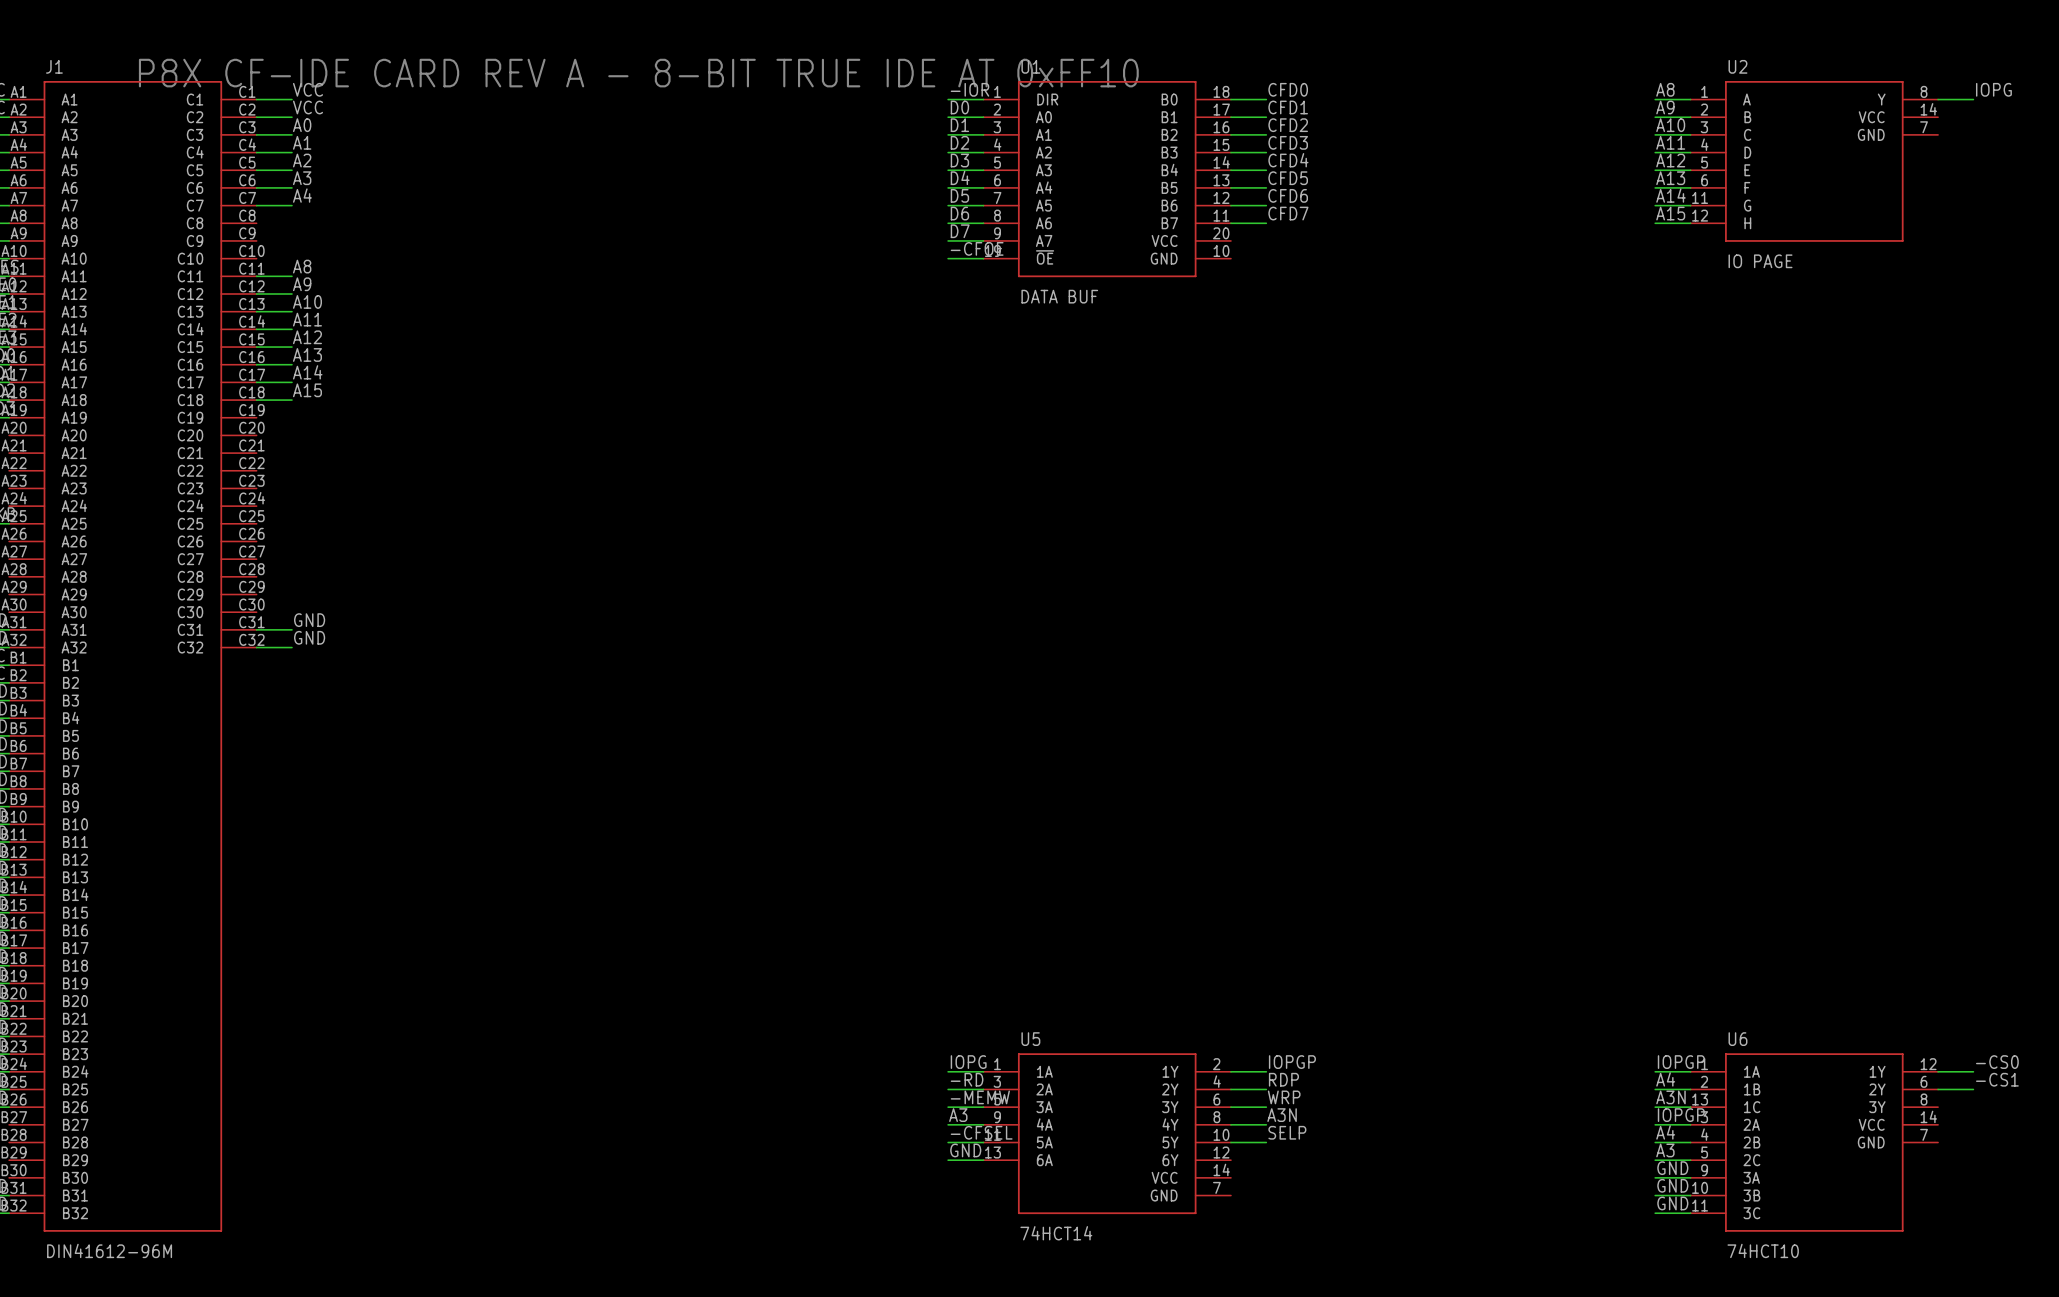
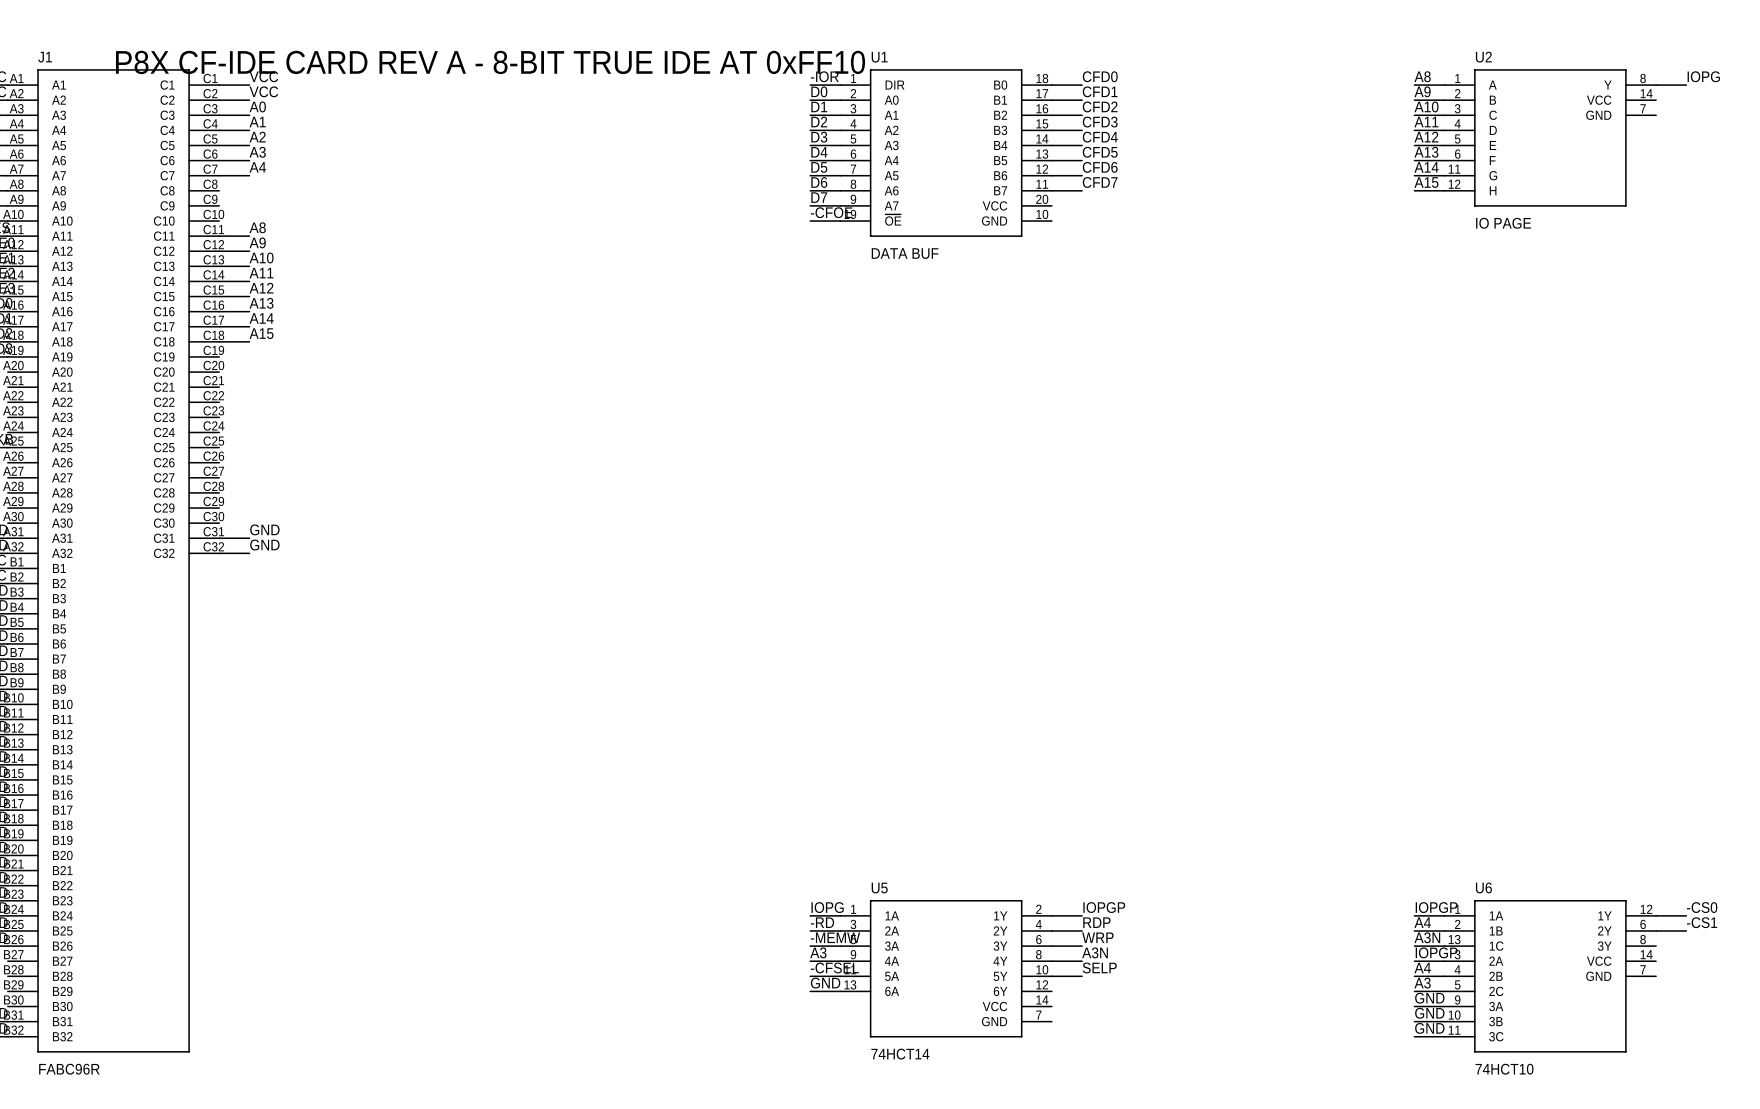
J1 value: DIN41612-96M (109, 1250) -> FABC96R (69, 1069)

